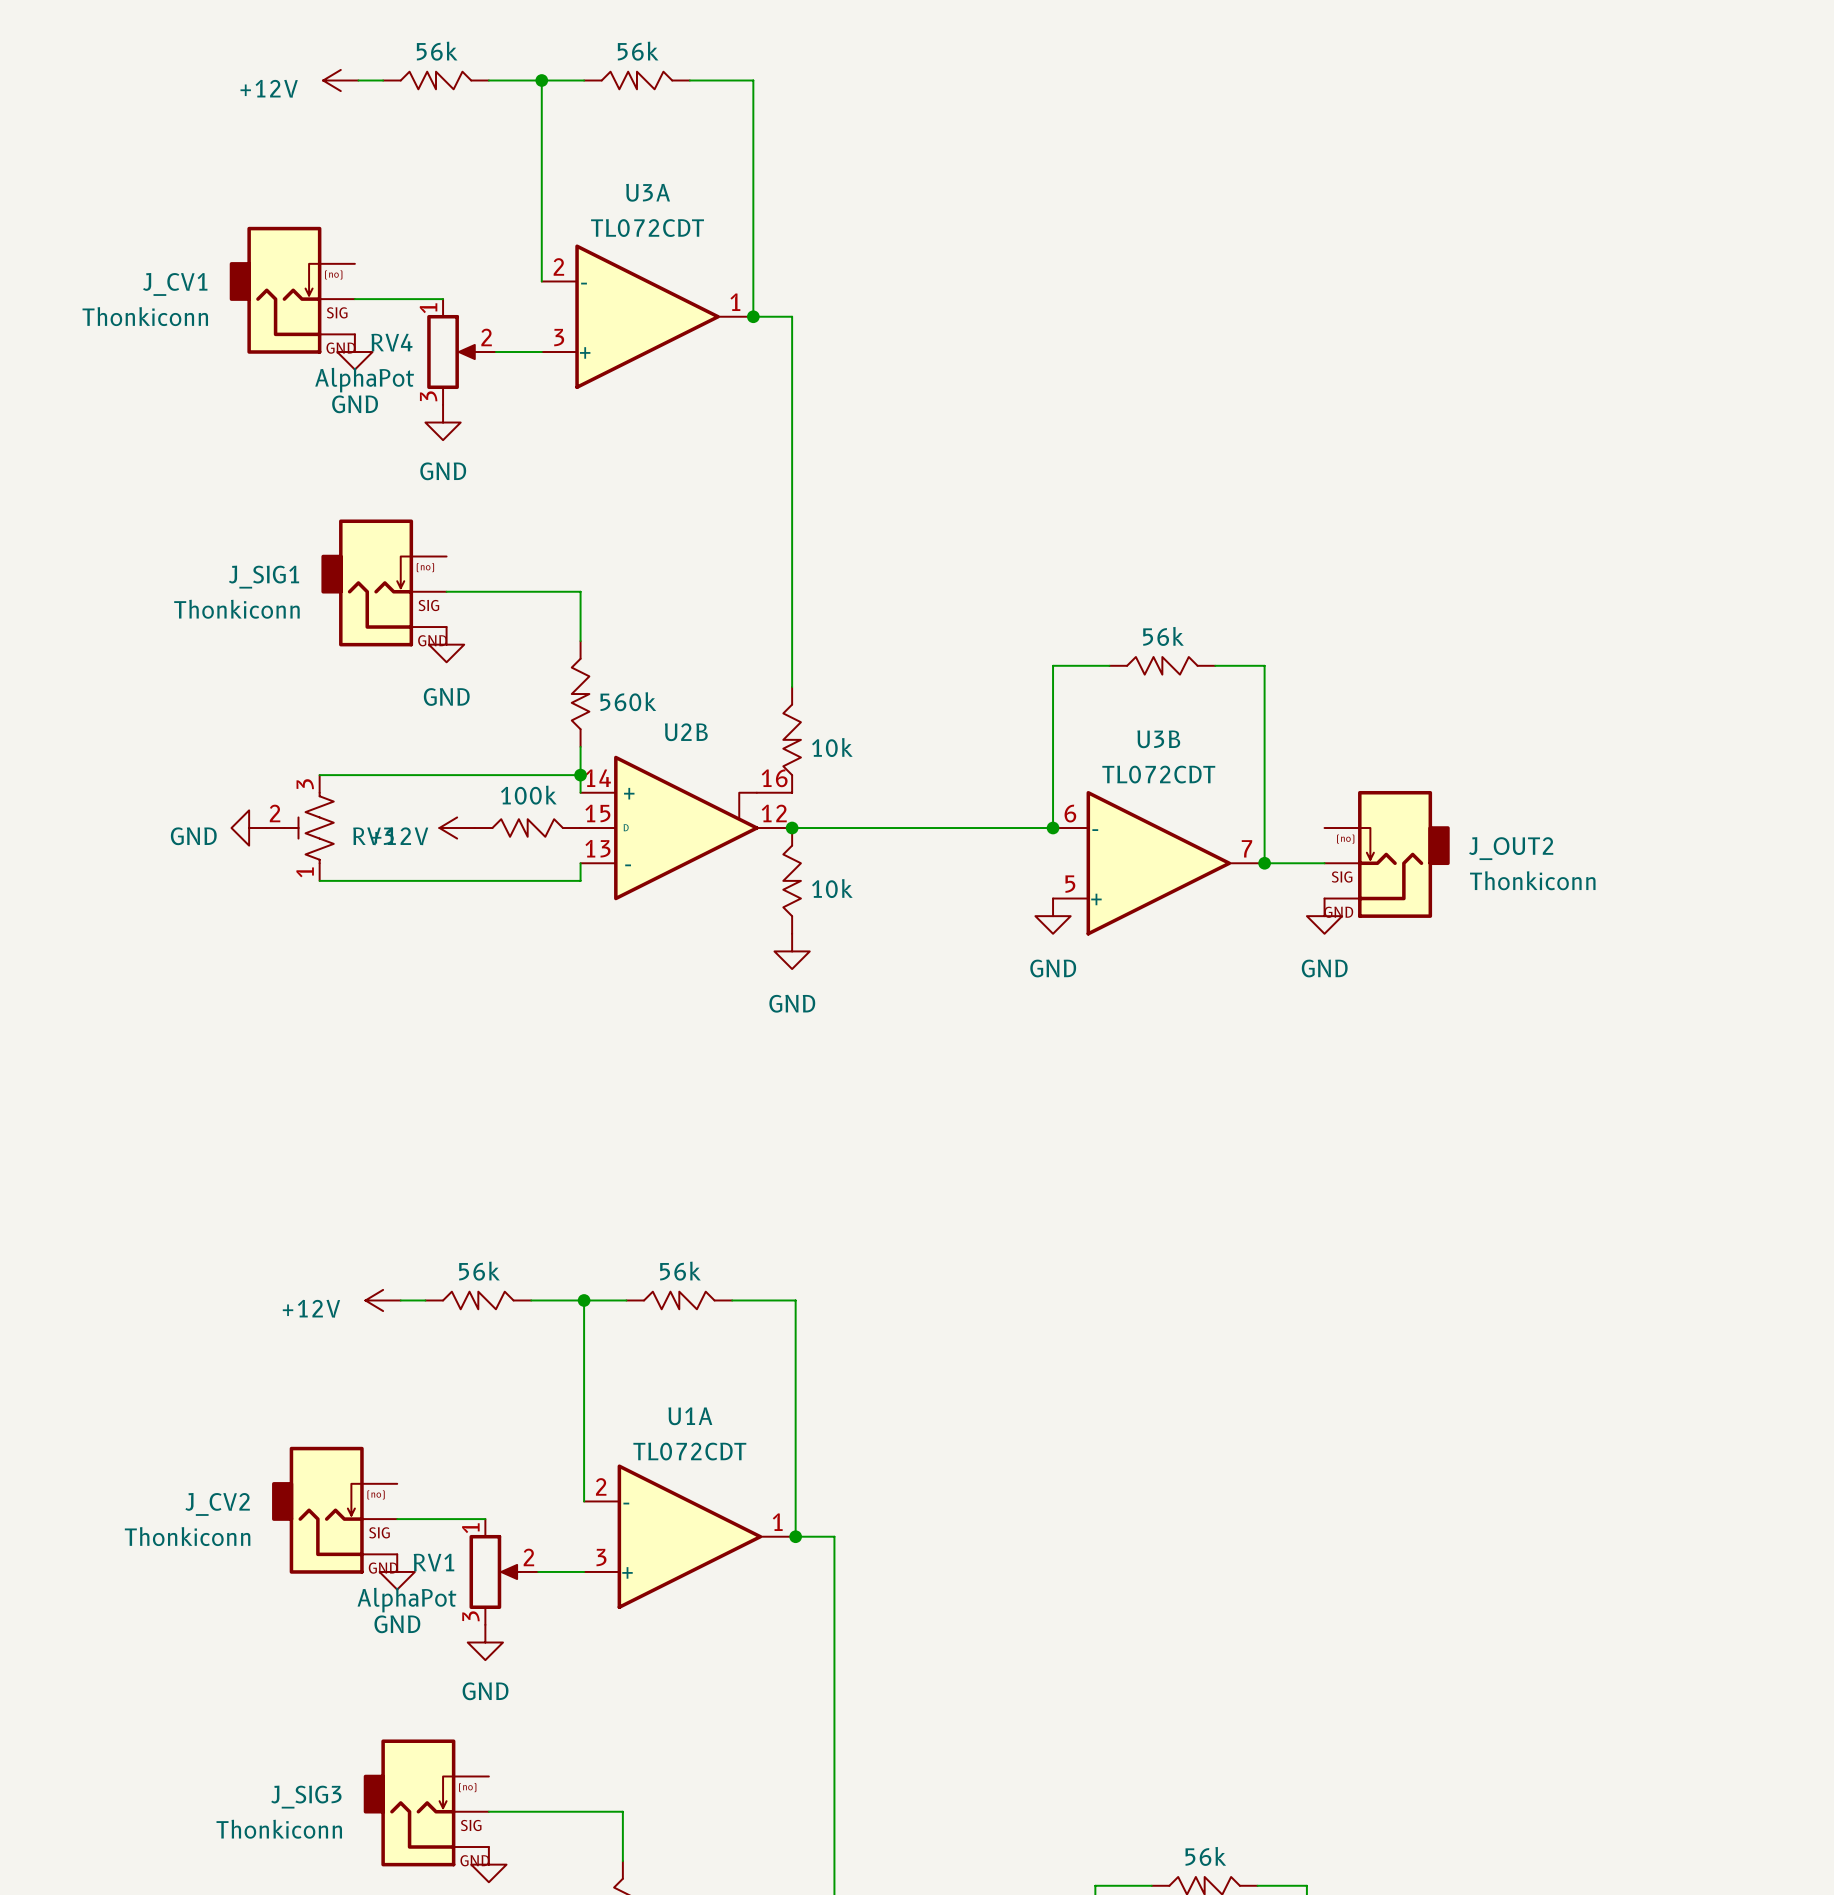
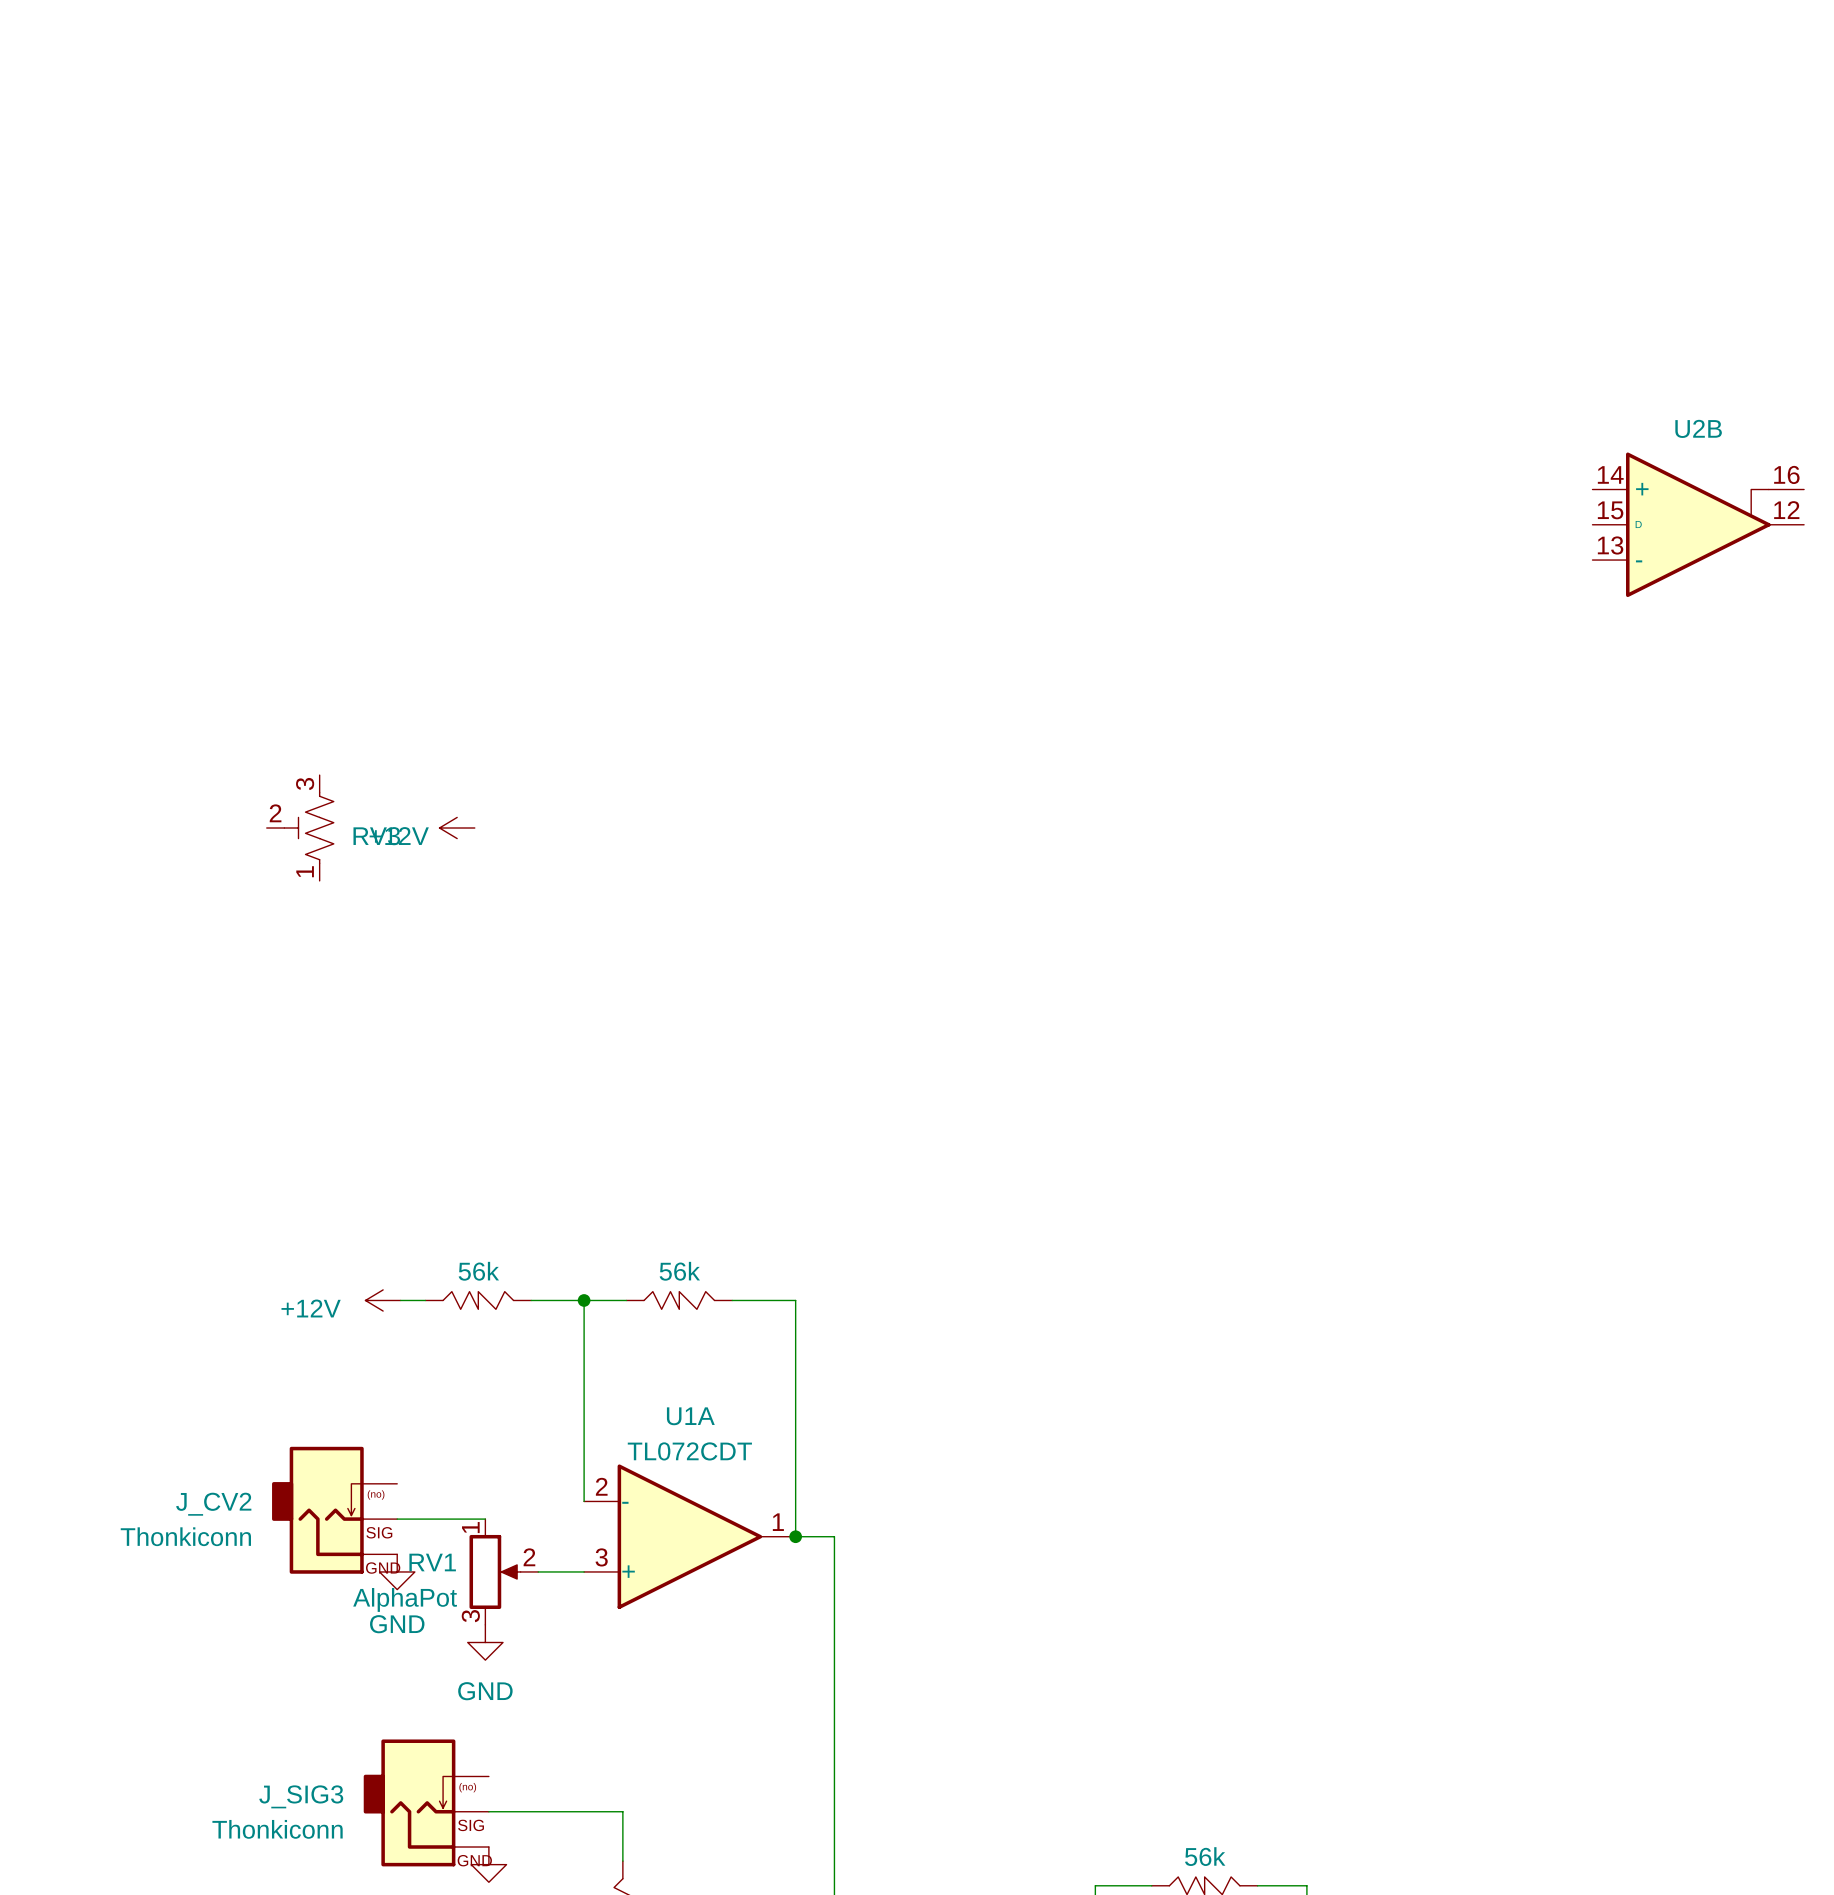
power symbol: +12V (340, 80) -> none
wire: (358, 80) (383, 80) -> none
part: 56k (436, 80) -> none
wire: (488, 80) (584, 80) -> none
wire: (541, 80) (541, 281) -> none
junction: (541, 80) -> none
part: 56k (636, 80) -> none
wire: (689, 80) (753, 80) (753, 316) (792, 316) (792, 686) -> none
J_CV1: Thonkiconn (292, 290) -> none
wire: (354, 299) (443, 299) -> none
U3A: TL072CDT (647, 316) -> none
junction: (753, 316) -> none
power symbol: GND (354, 352) -> none
RV4: AlphaPot (461, 352) -> none
wire: (495, 352) (541, 352) -> none
power symbol: GND (443, 422) -> none
J_SIG1: Thonkiconn (384, 582) -> none
wire: (446, 591) (580, 591) (580, 641) -> none
power symbol: GND (446, 644) -> none
wire: (1109, 665) (1053, 665) (1053, 828) (792, 828) -> none
part: 56k (1162, 665) -> none
wire: (1215, 665) (1264, 665) (1264, 863) (1324, 863) -> none
part: 560k (580, 694) -> none
part: 10k (792, 739) -> none
wire: (580, 746) (580, 792) -> none
wire: (319, 775) (580, 775) -> none
junction: (580, 775) -> none
power symbol: GND (249, 828) -> none
part: 100k (527, 828) -> none
U2B position: (686, 828) -> (1698, 524)
junction: (792, 828) -> none
junction: (1053, 828) -> none
J_OUT2: Thonkiconn (1387, 854) -> none
wire: (580, 863) (580, 880) (319, 880) -> none
U3B: TL072CDT (1158, 863) -> none
junction: (1264, 863) -> none
part: 10k (792, 880) -> none
power symbol: GND (1053, 916) -> none
power symbol: GND (1324, 916) -> none
power symbol: GND (792, 951) -> none

